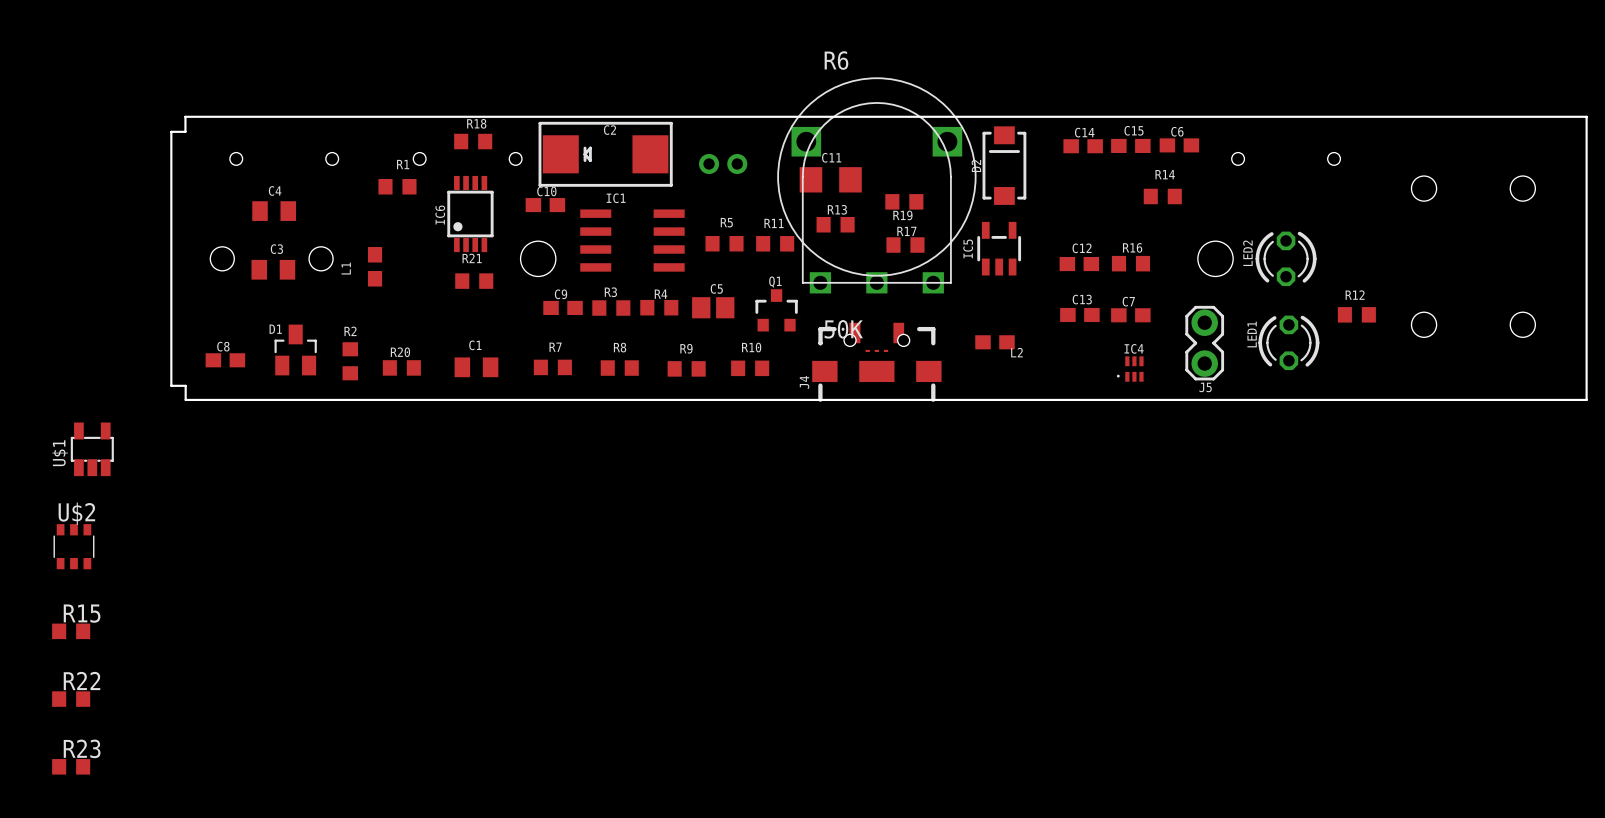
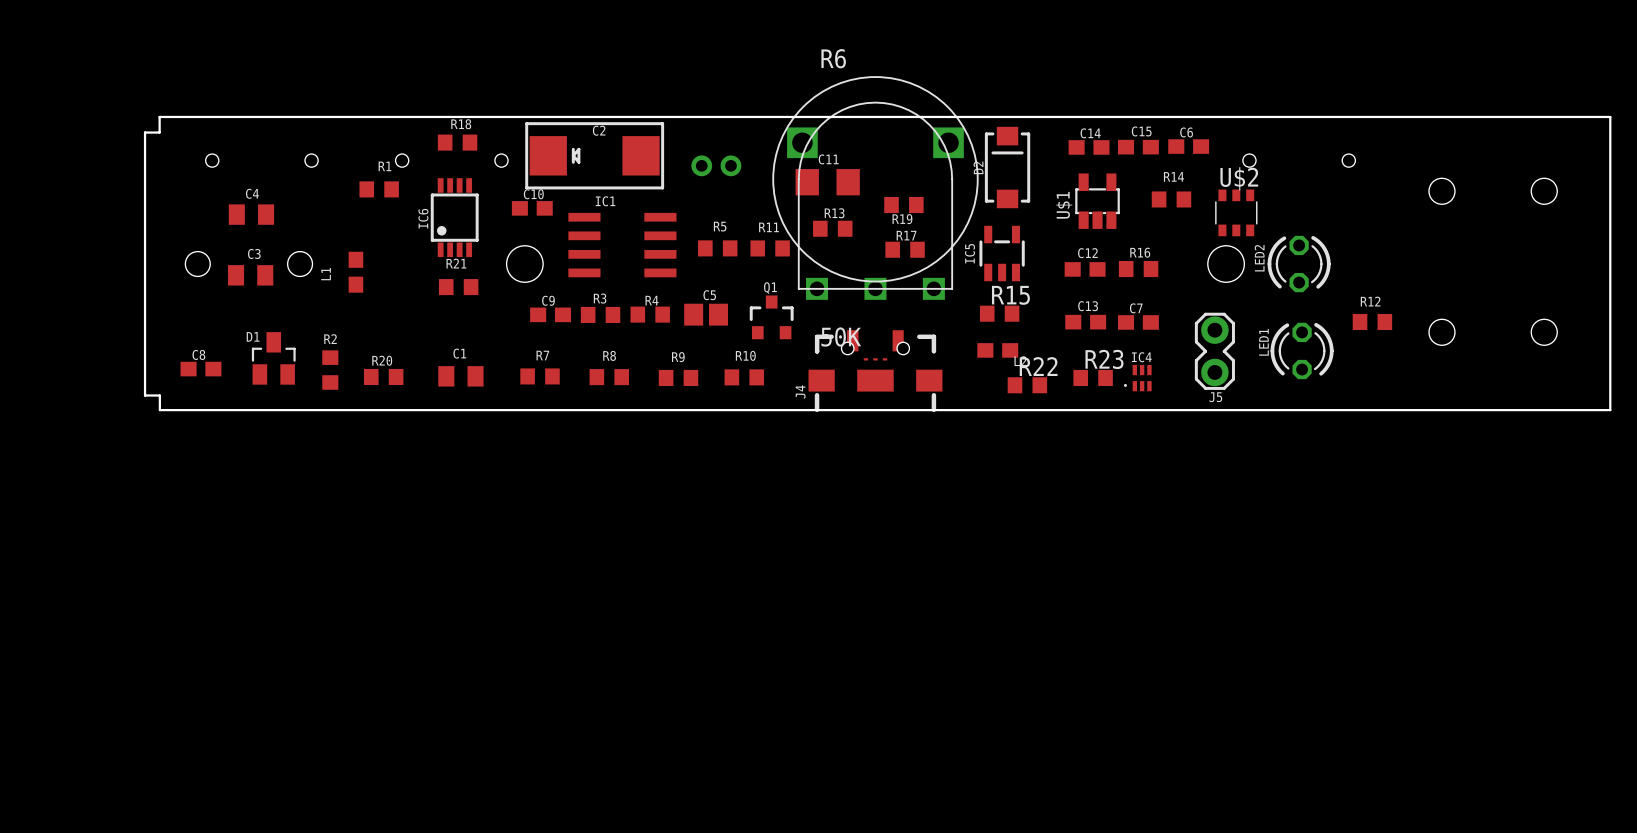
U$1 position: (92, 449) -> (1097, 201)
U$2 position: (73, 546) -> (1236, 212)
R15 position: (71, 631) -> (999, 313)
R22 position: (71, 699) -> (1027, 385)
R23 position: (71, 766) -> (1093, 377)

